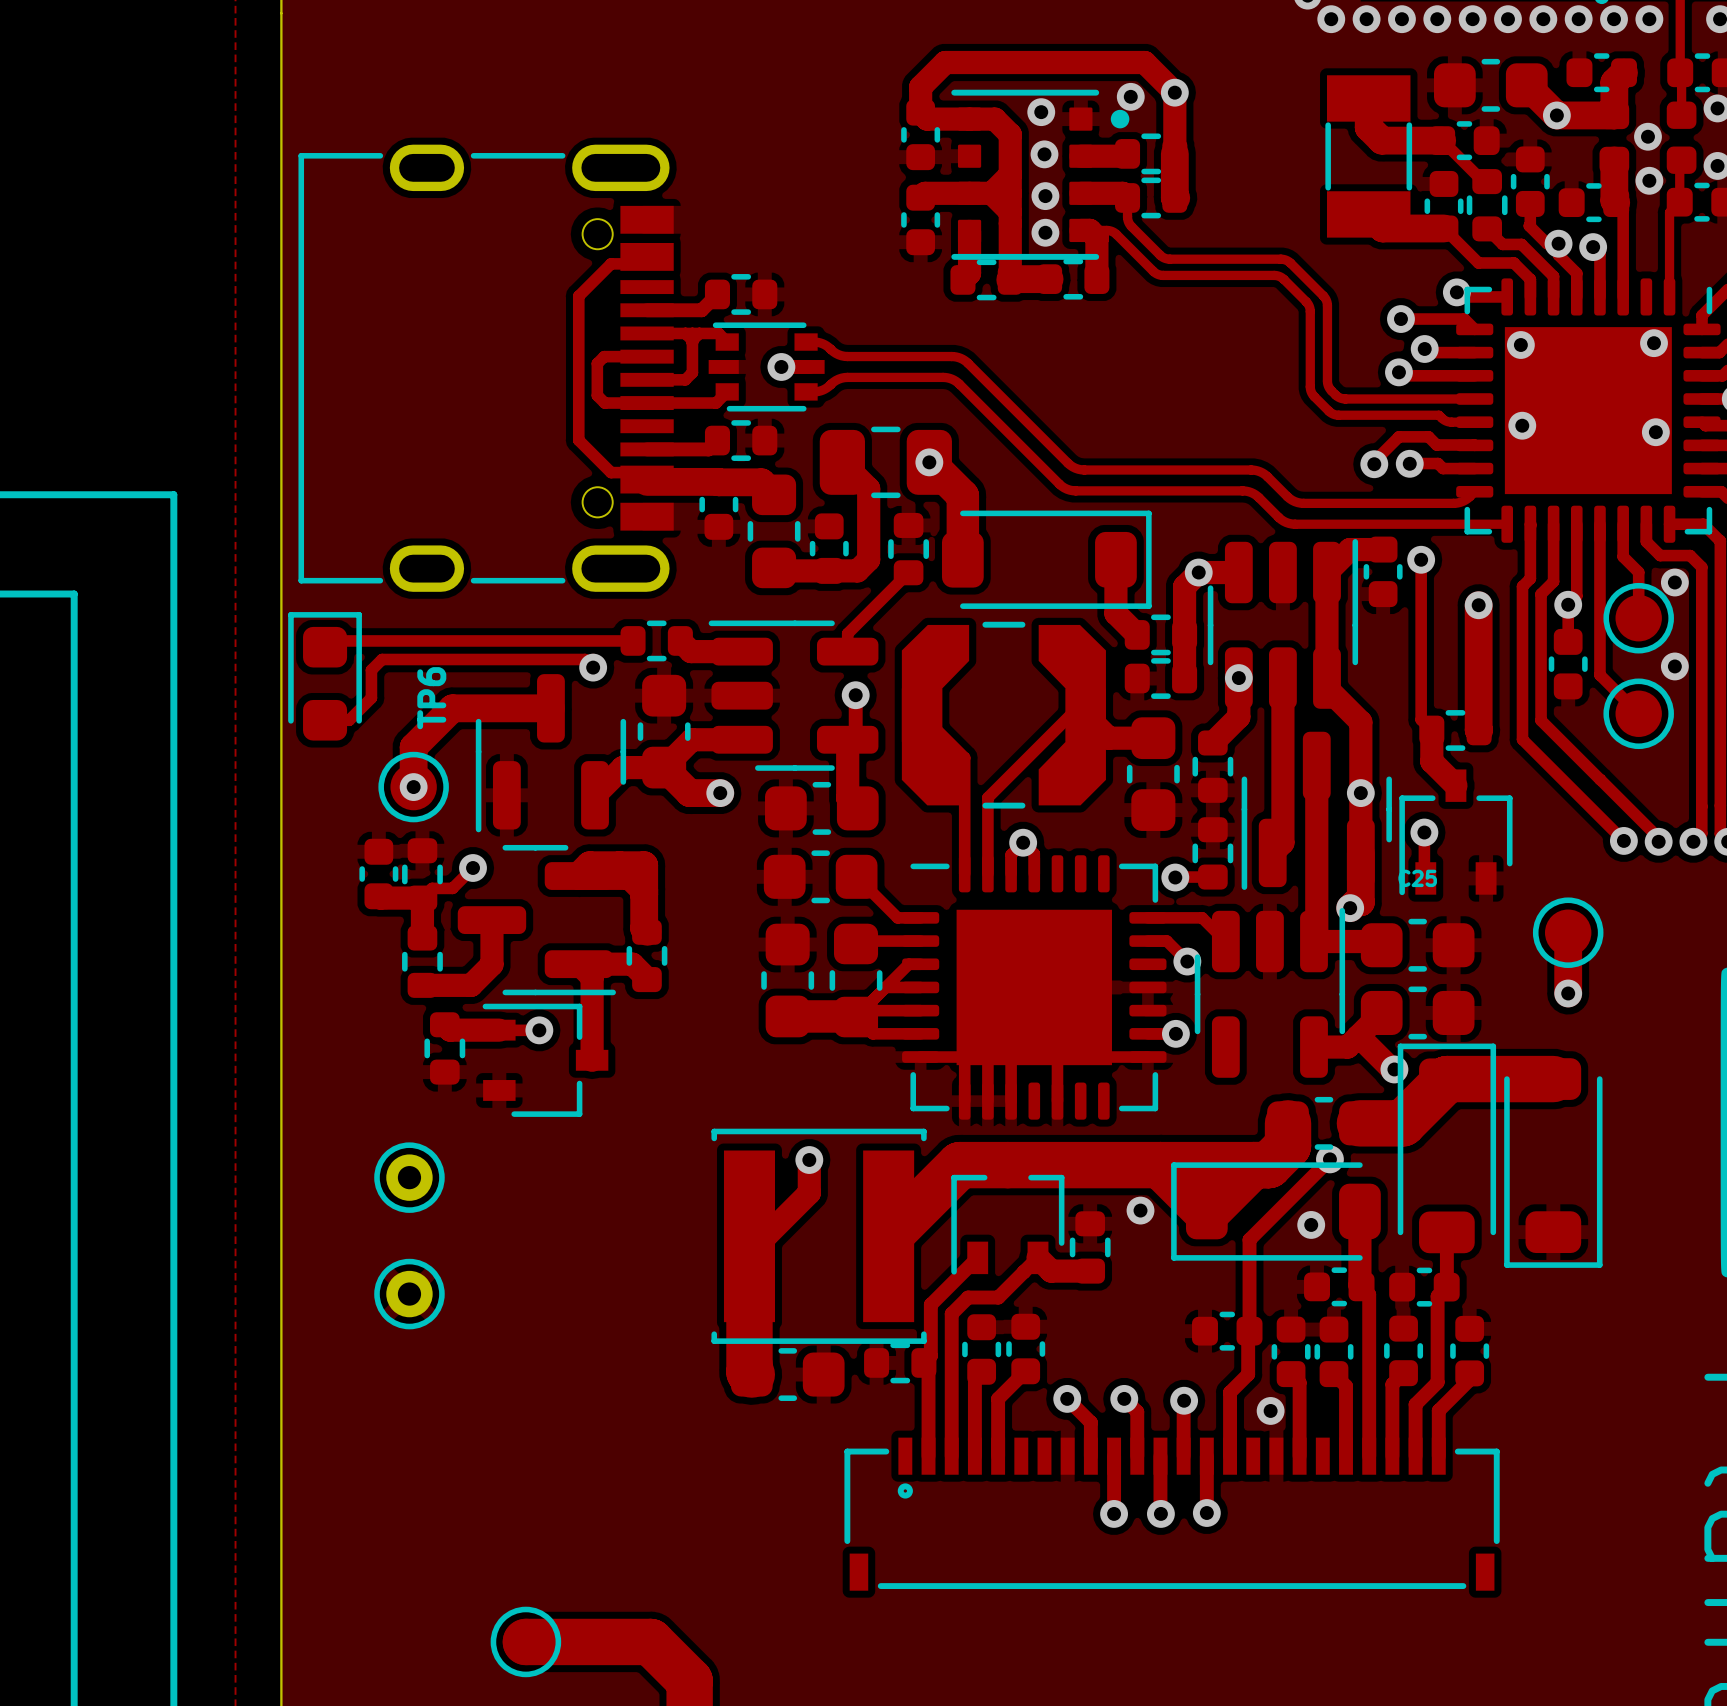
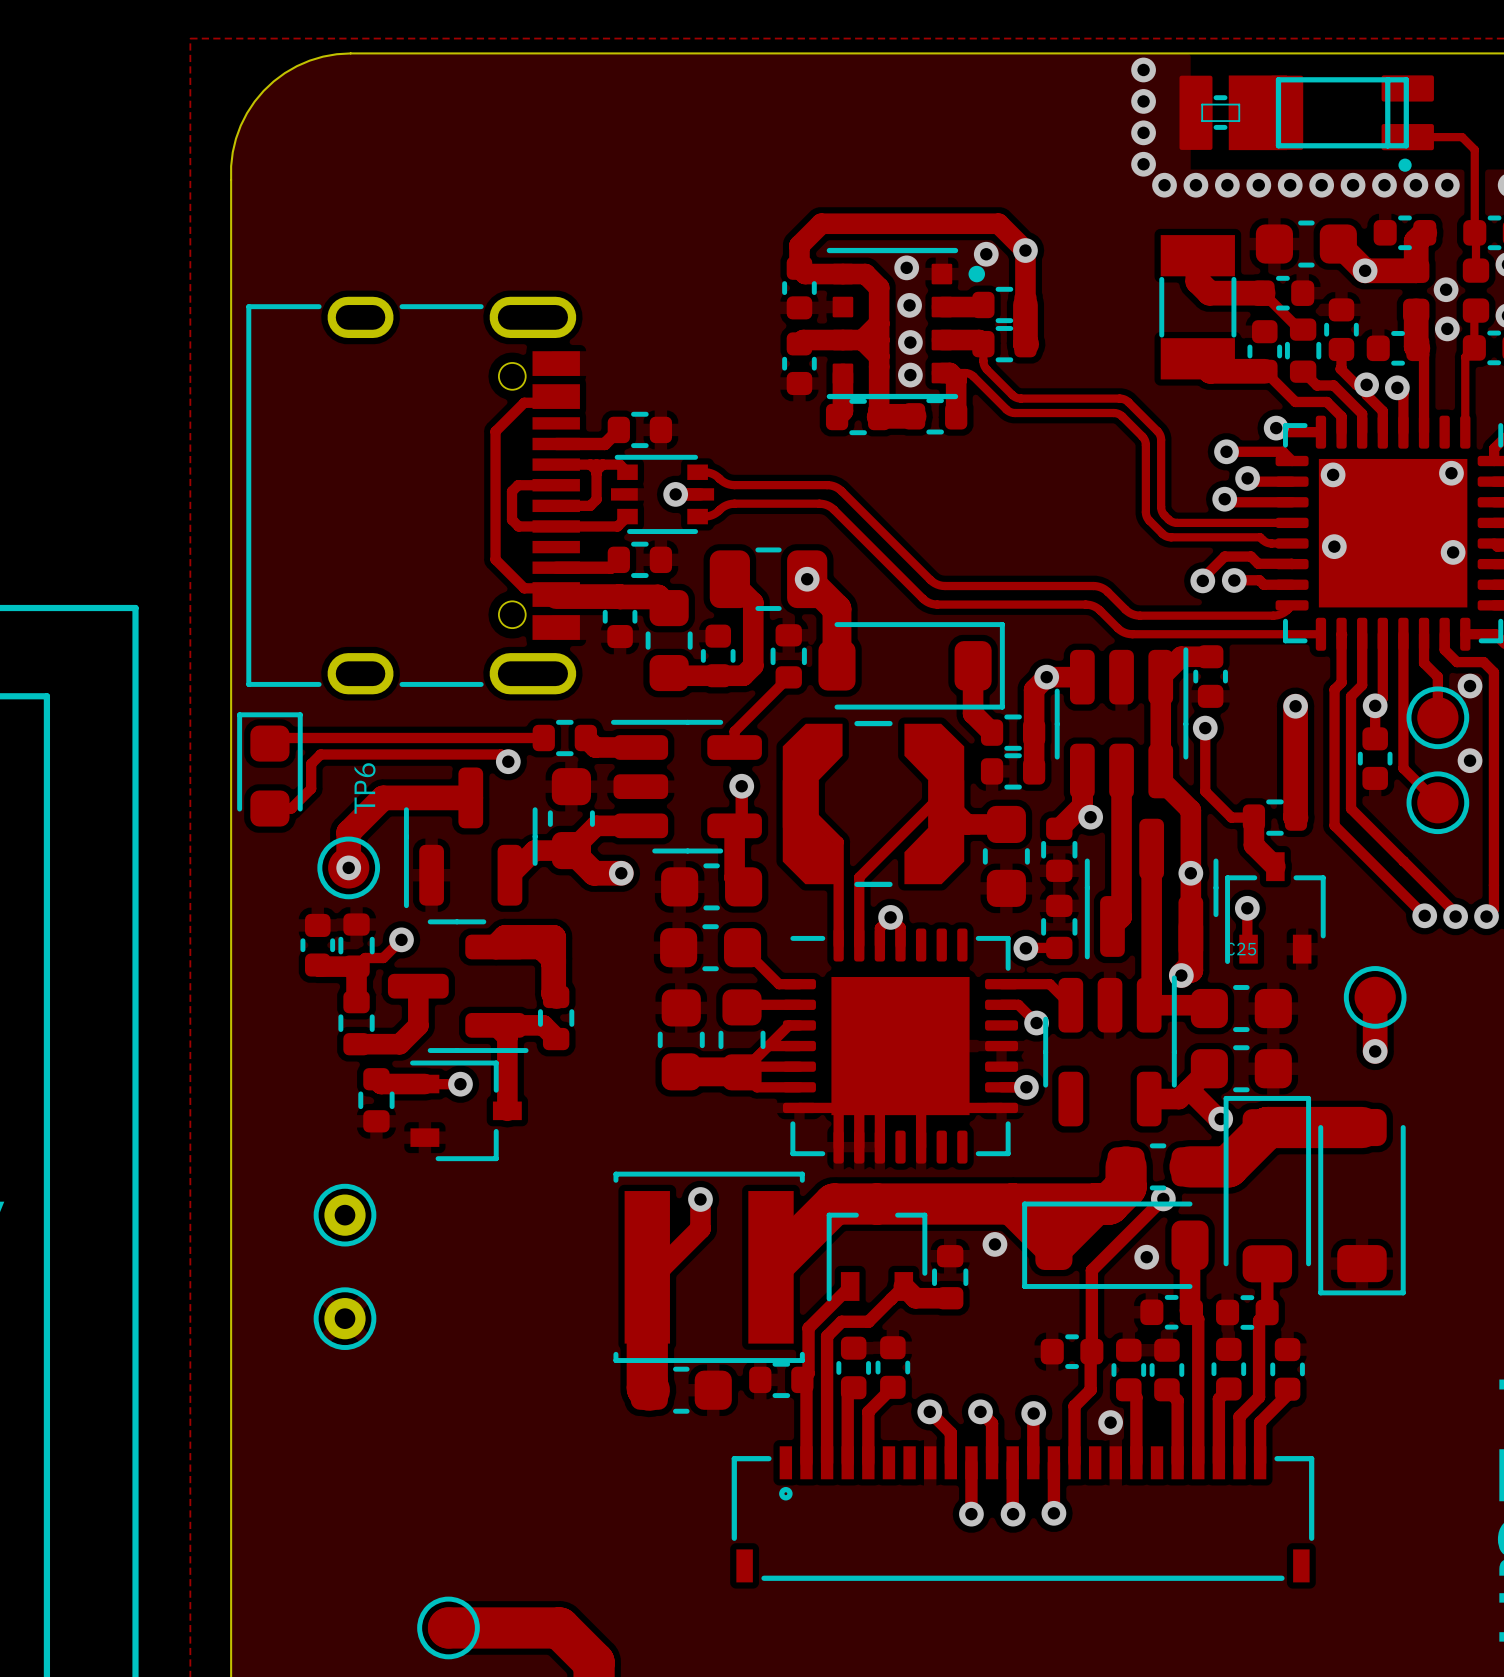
track: (1421, 559) (1421, 719) (1431, 730) -> (1205, 728) (1205, 791) (1231, 817) (1253, 817)
via: (1421, 559) -> none
via: none -> (1205, 728)
via position: (1238, 678) -> (1090, 817)

